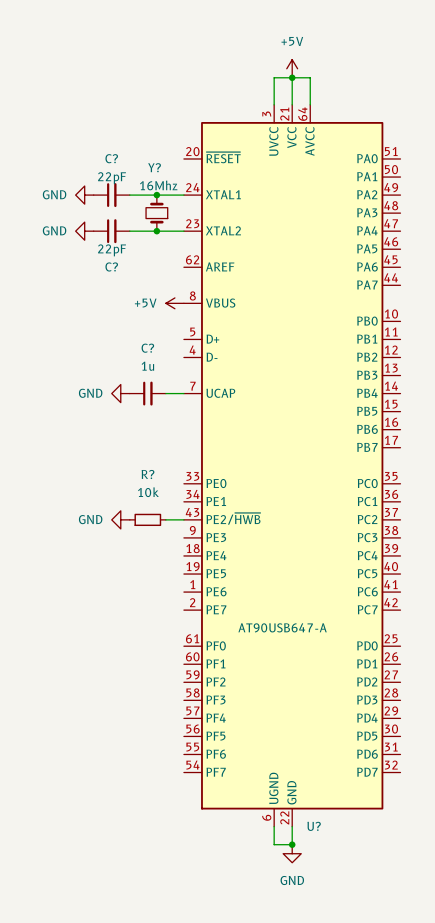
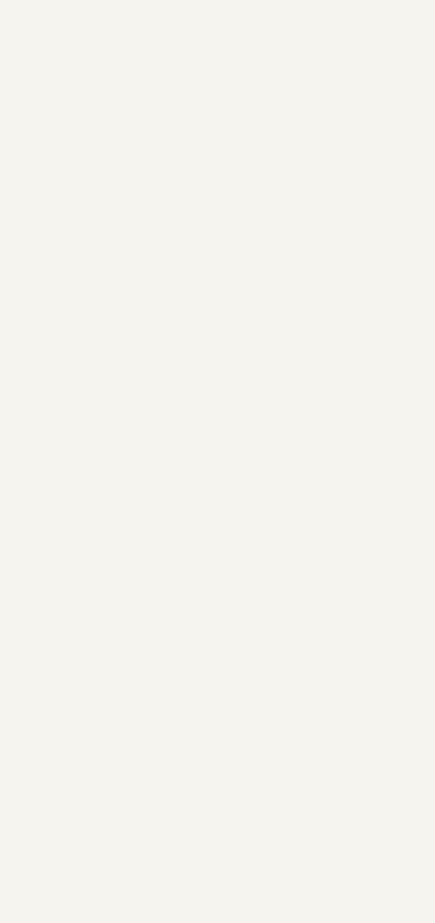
power symbol: +5V (292, 68) -> none
wire: (292, 77) (292, 104) -> none
junction: (292, 77) -> none
wire: (274, 104) (274, 77) (310, 77) (310, 104) -> none
power symbol: GND (84, 195) -> none
C?: 22pF (111, 195) -> none
wire: (129, 195) (183, 195) -> none
junction: (156, 195) -> none
Y?: 16Mhz (156, 213) -> none
power symbol: GND (84, 231) -> none
C?: 22pF (111, 231) -> none
wire: (129, 231) (183, 231) -> none
junction: (156, 231) -> none
power symbol: +5V (174, 303) -> none
power symbol: GND (120, 393) -> none
C?: 1u (147, 393) -> none
wire: (165, 393) (183, 393) -> none
U?: AT90USB647-A (292, 465) -> none
power symbol: GND (120, 519) -> none
R?: 10k (147, 519) -> none
wire: (165, 519) (183, 519) -> none
wire: (274, 826) (274, 844) (292, 844) (292, 826) -> none
junction: (292, 844) -> none
power symbol: GND (292, 853) -> none

